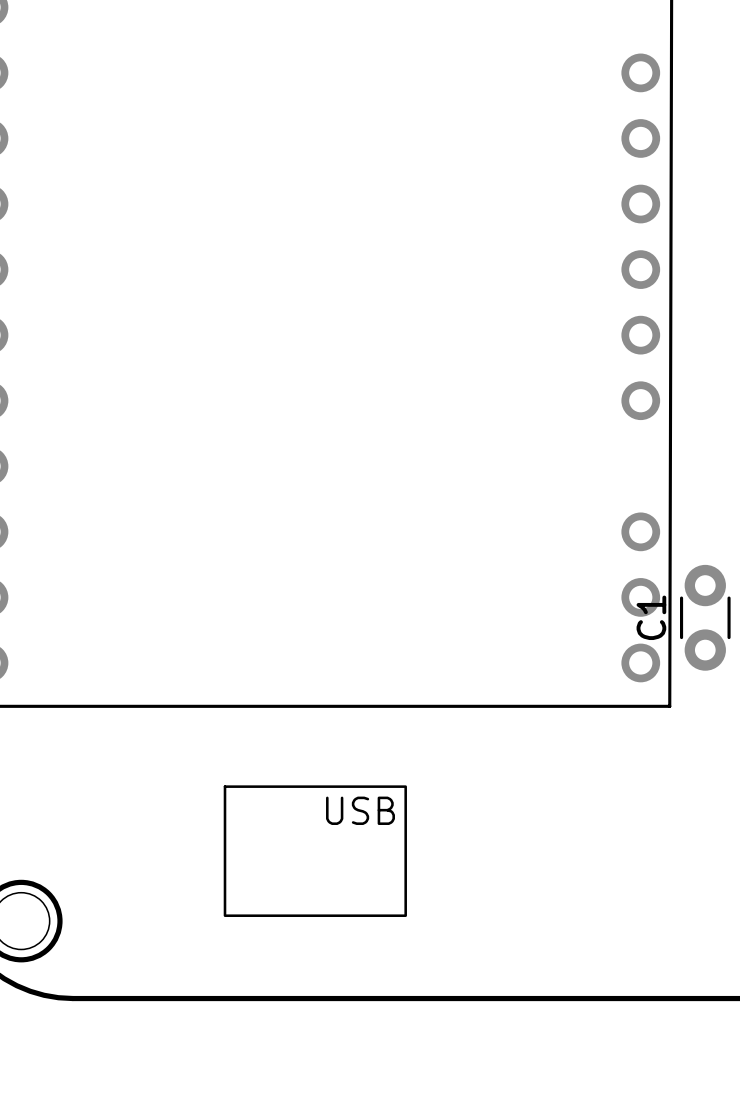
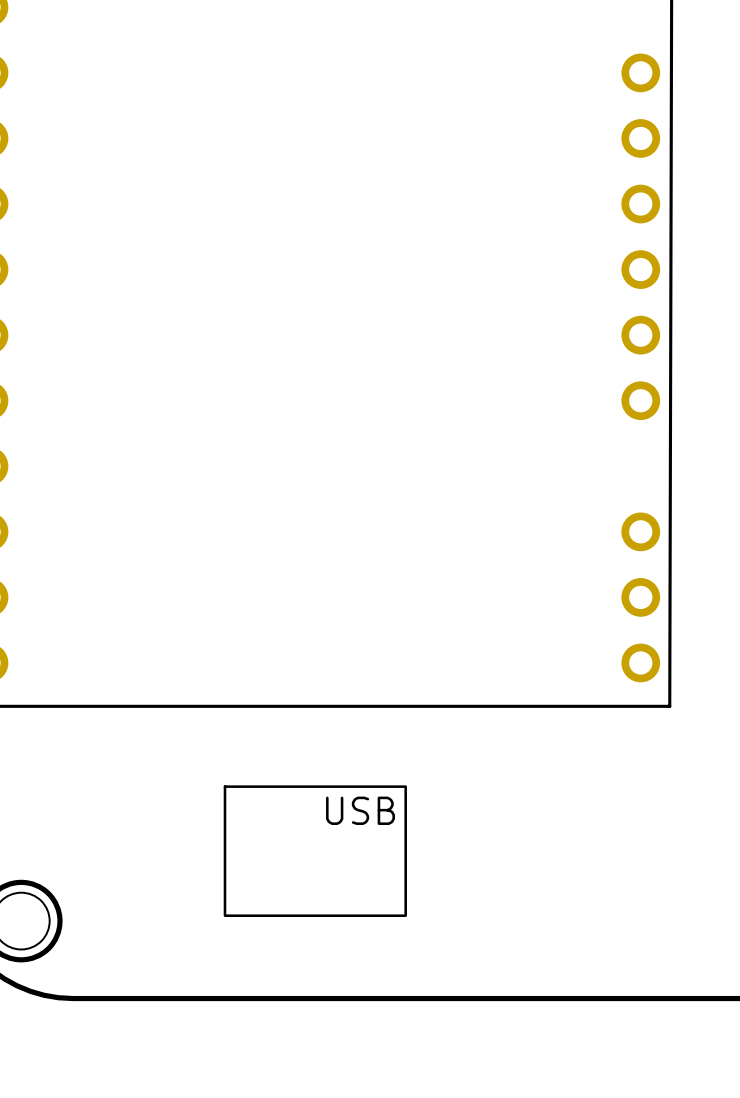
C1: (705, 617) -> none

